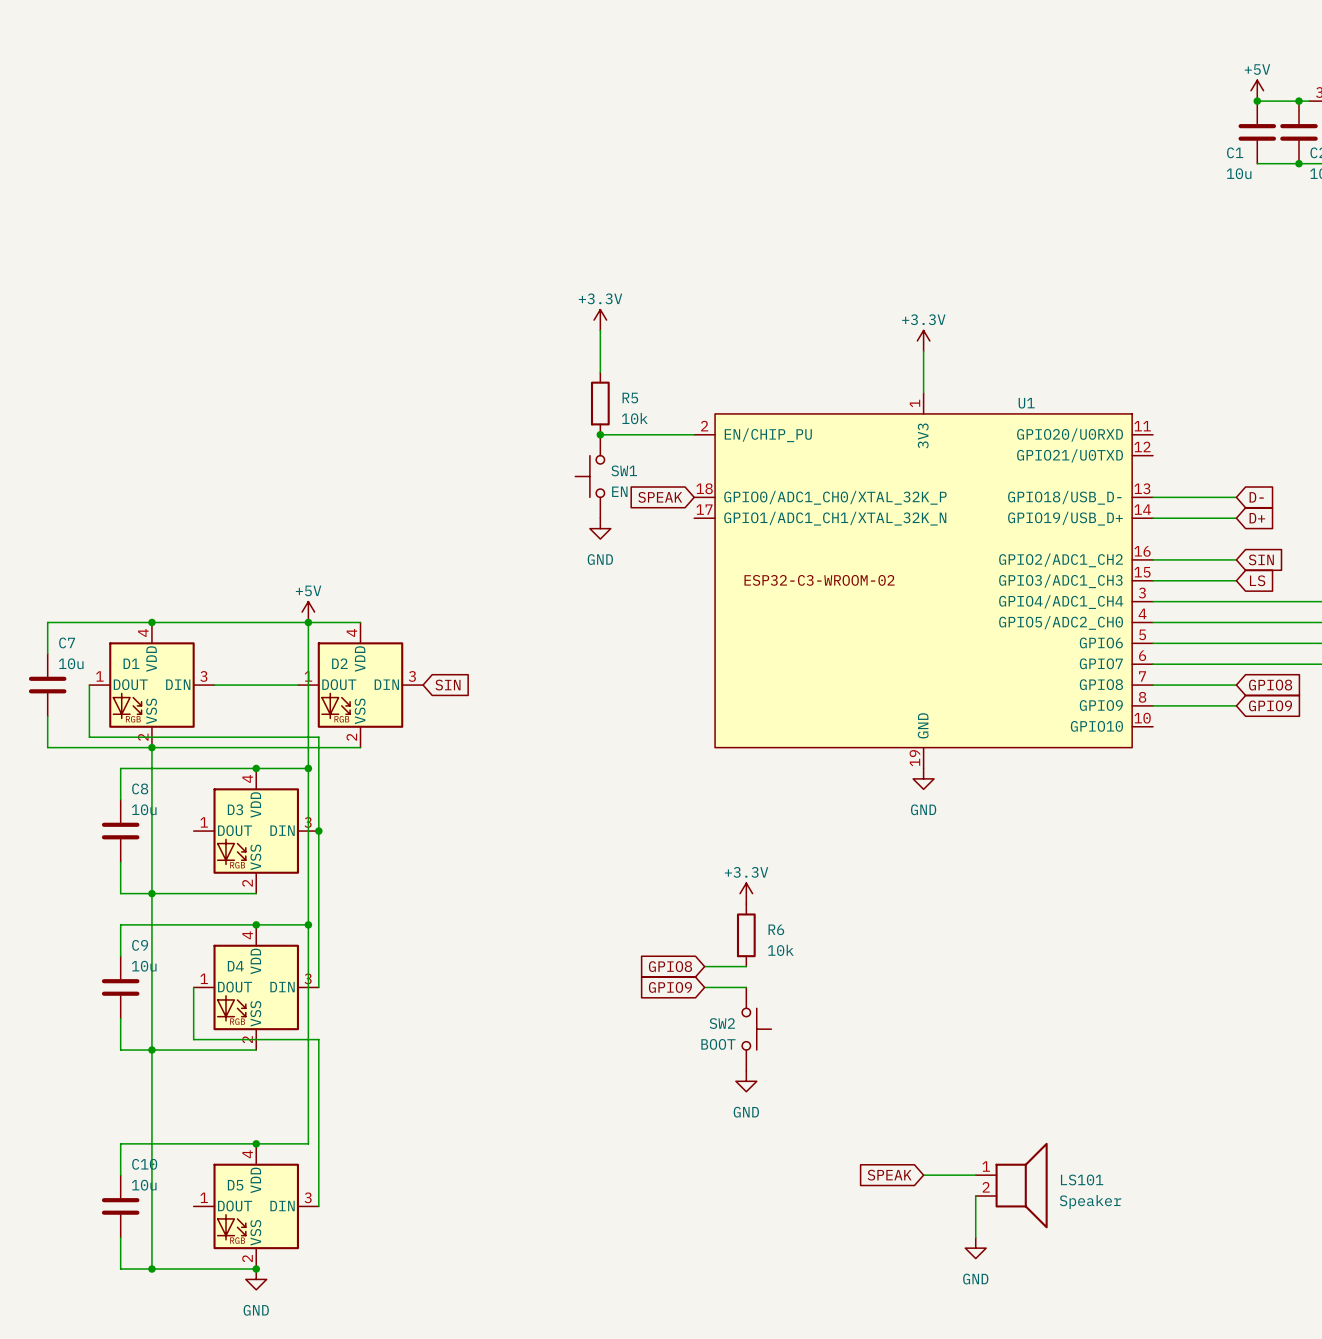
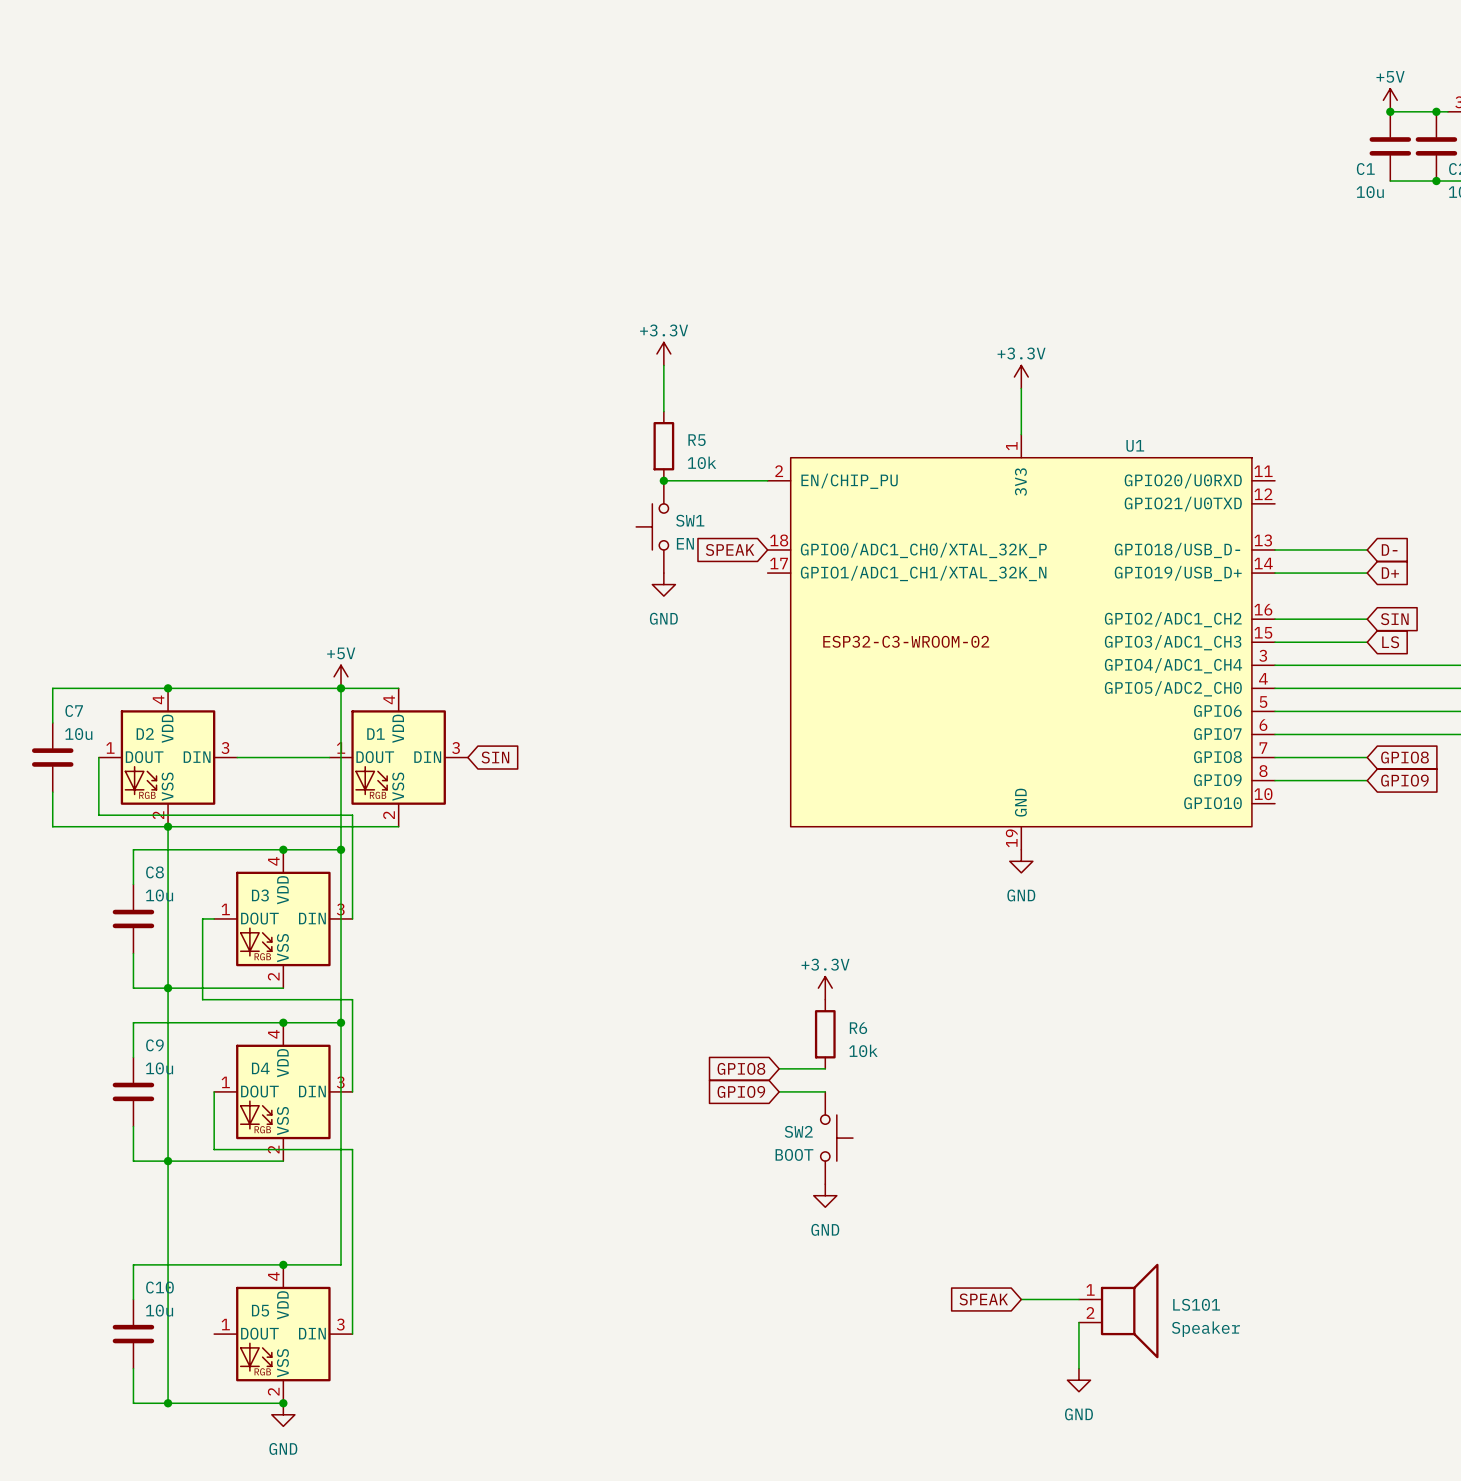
D1 name: D1 (131, 663) -> D2 (145, 733)
D2 name: D2 (339, 663) -> D1 (375, 734)
wire: (318, 831) (318, 904) -> (214, 918) (202, 918) (202, 999) (352, 999)
junction: (318, 831) -> none

